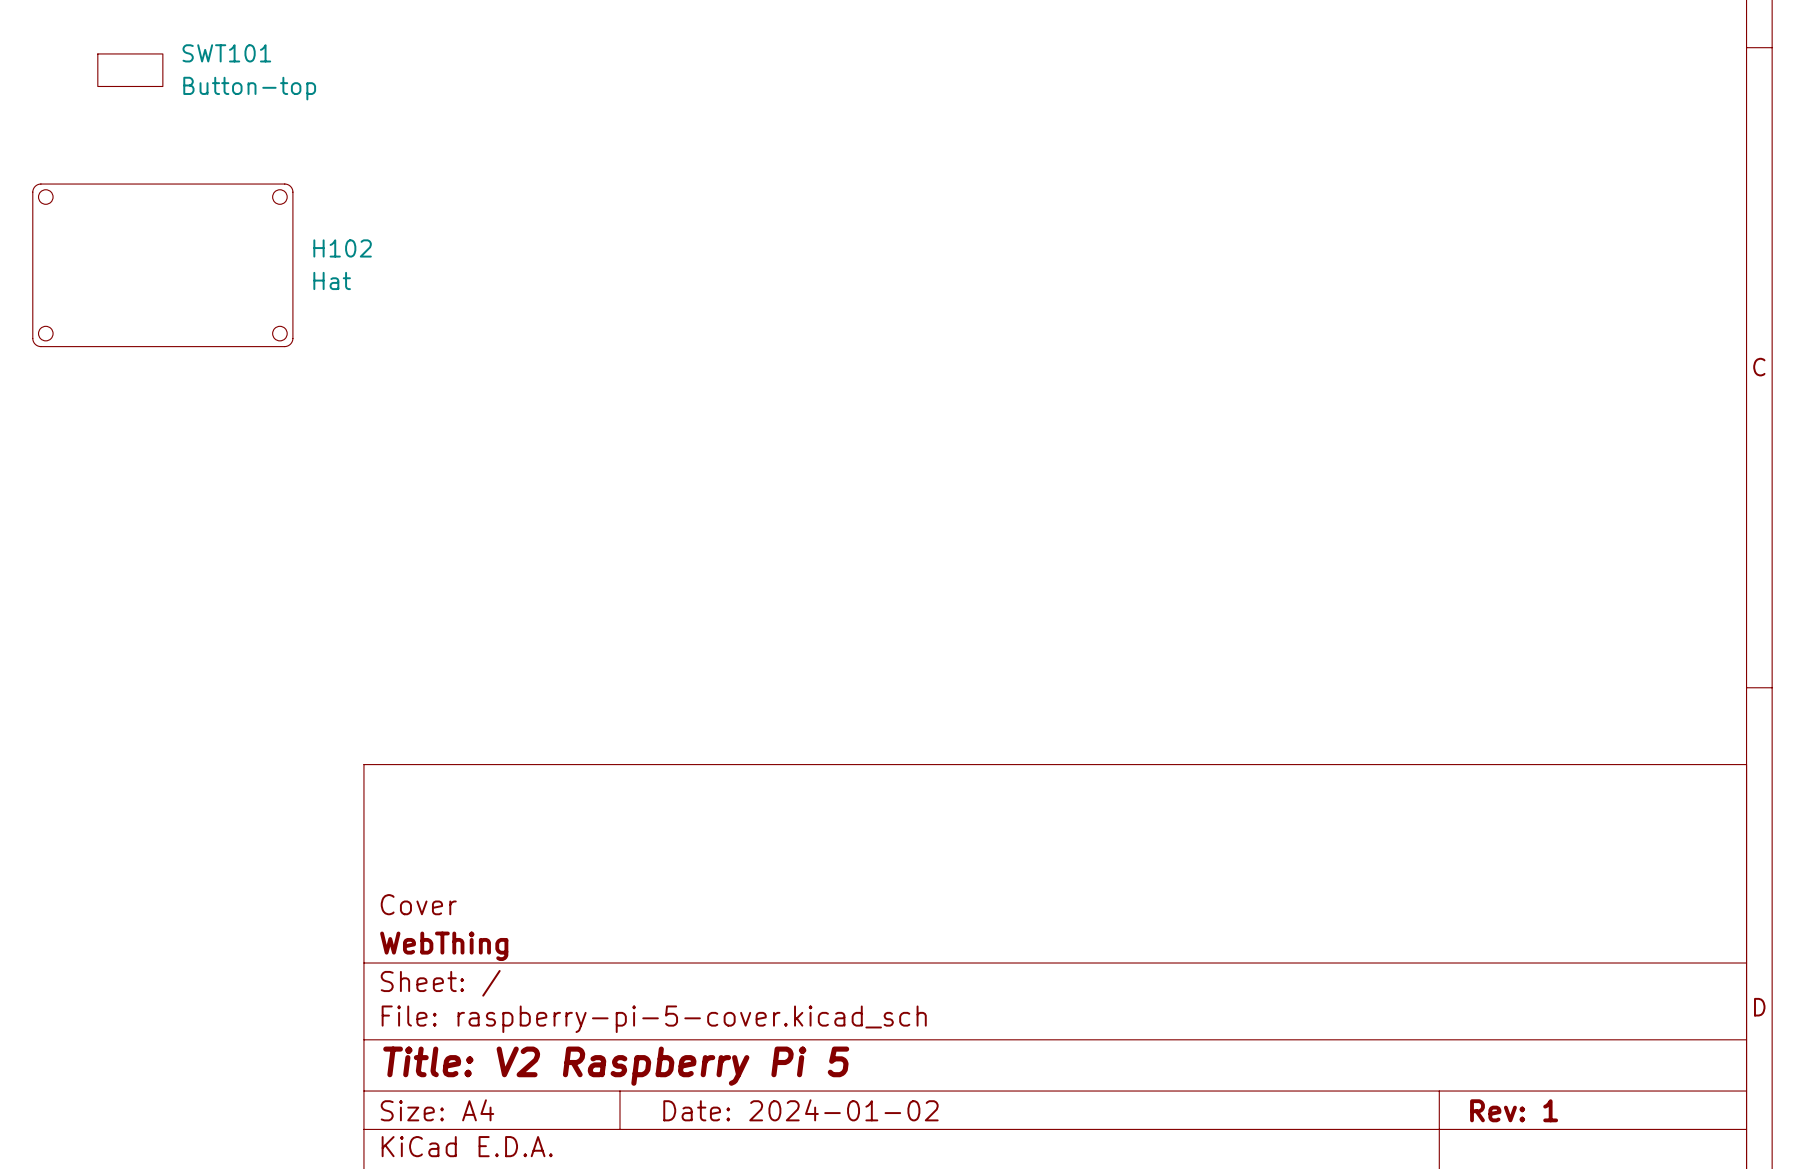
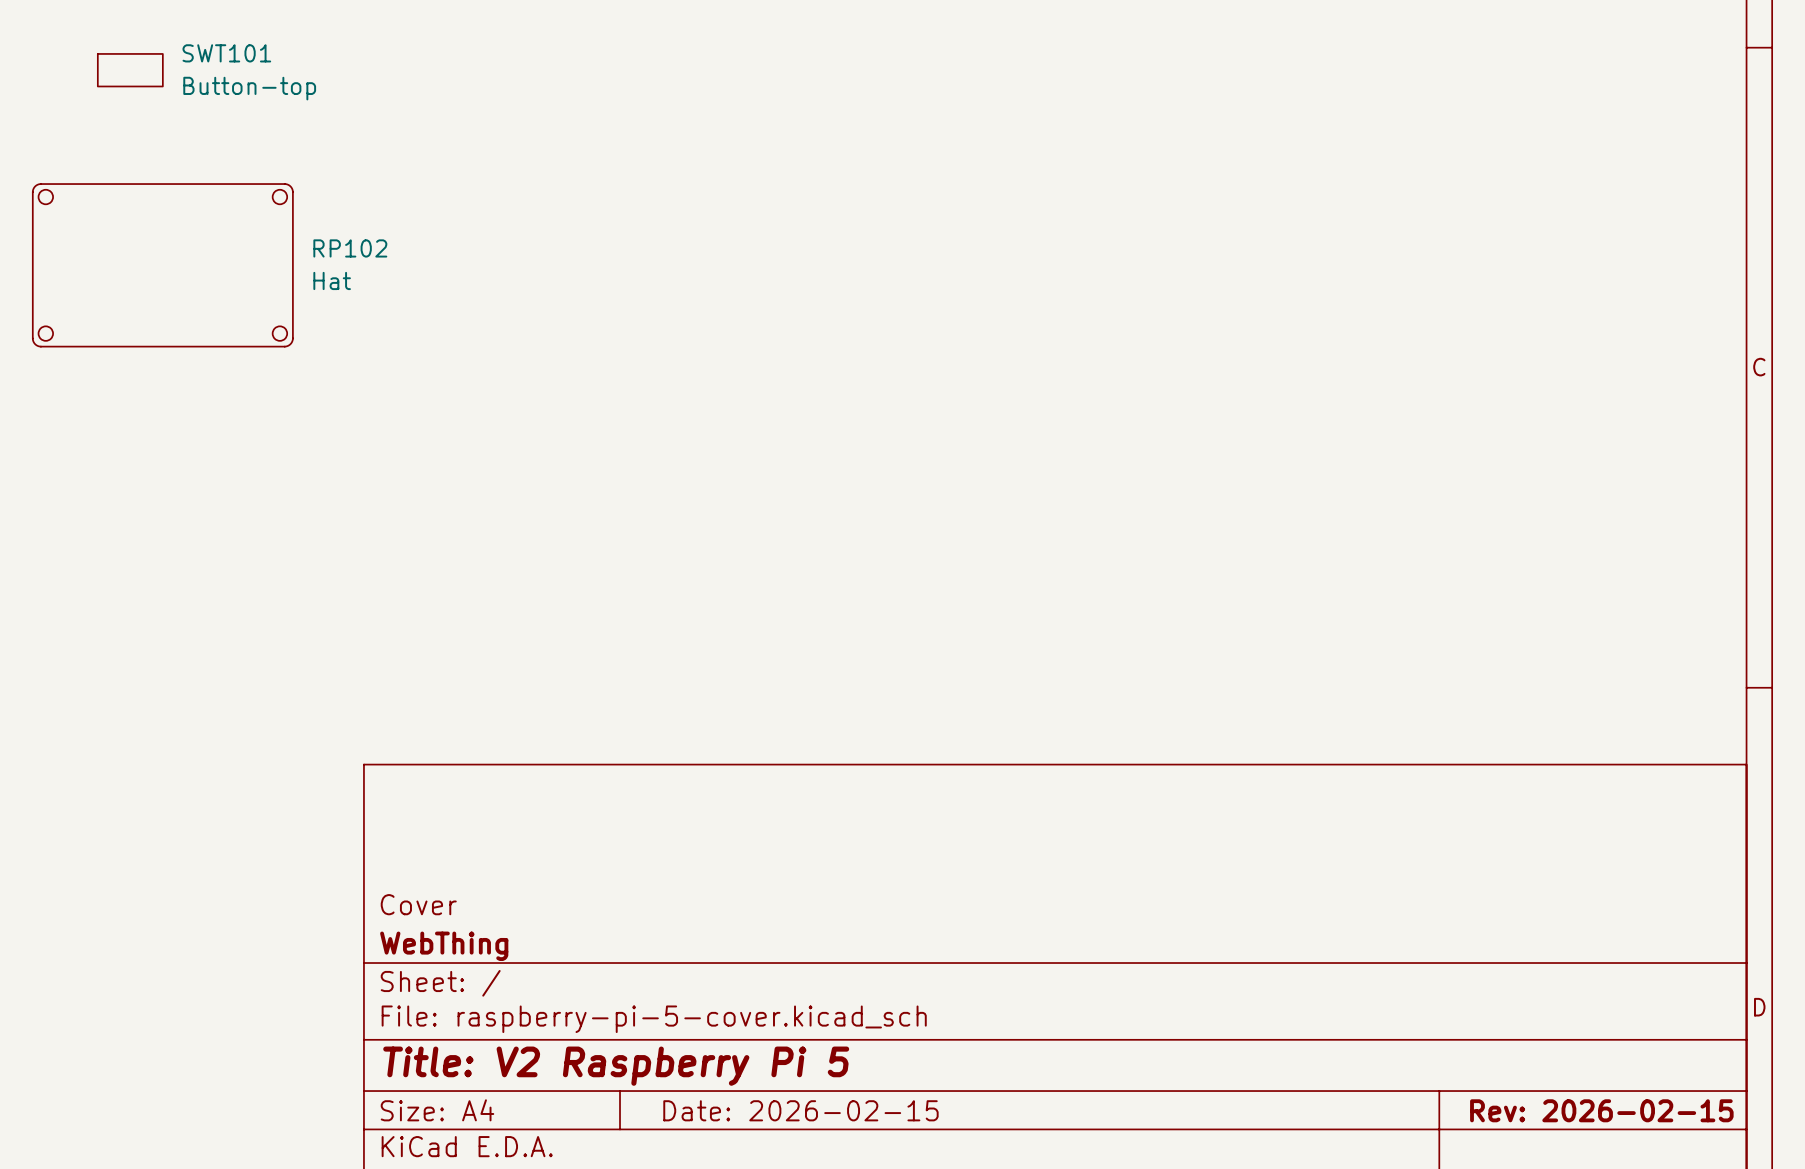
H102 name: H102 (342, 248) -> RP102 (350, 248)
title block: Date: 2024-01-02 (800, 1110) -> Date: 2026-02-15 (800, 1110)
title block: Rev: 1 (1514, 1110) -> Rev: 2026-02-15 (1601, 1110)

